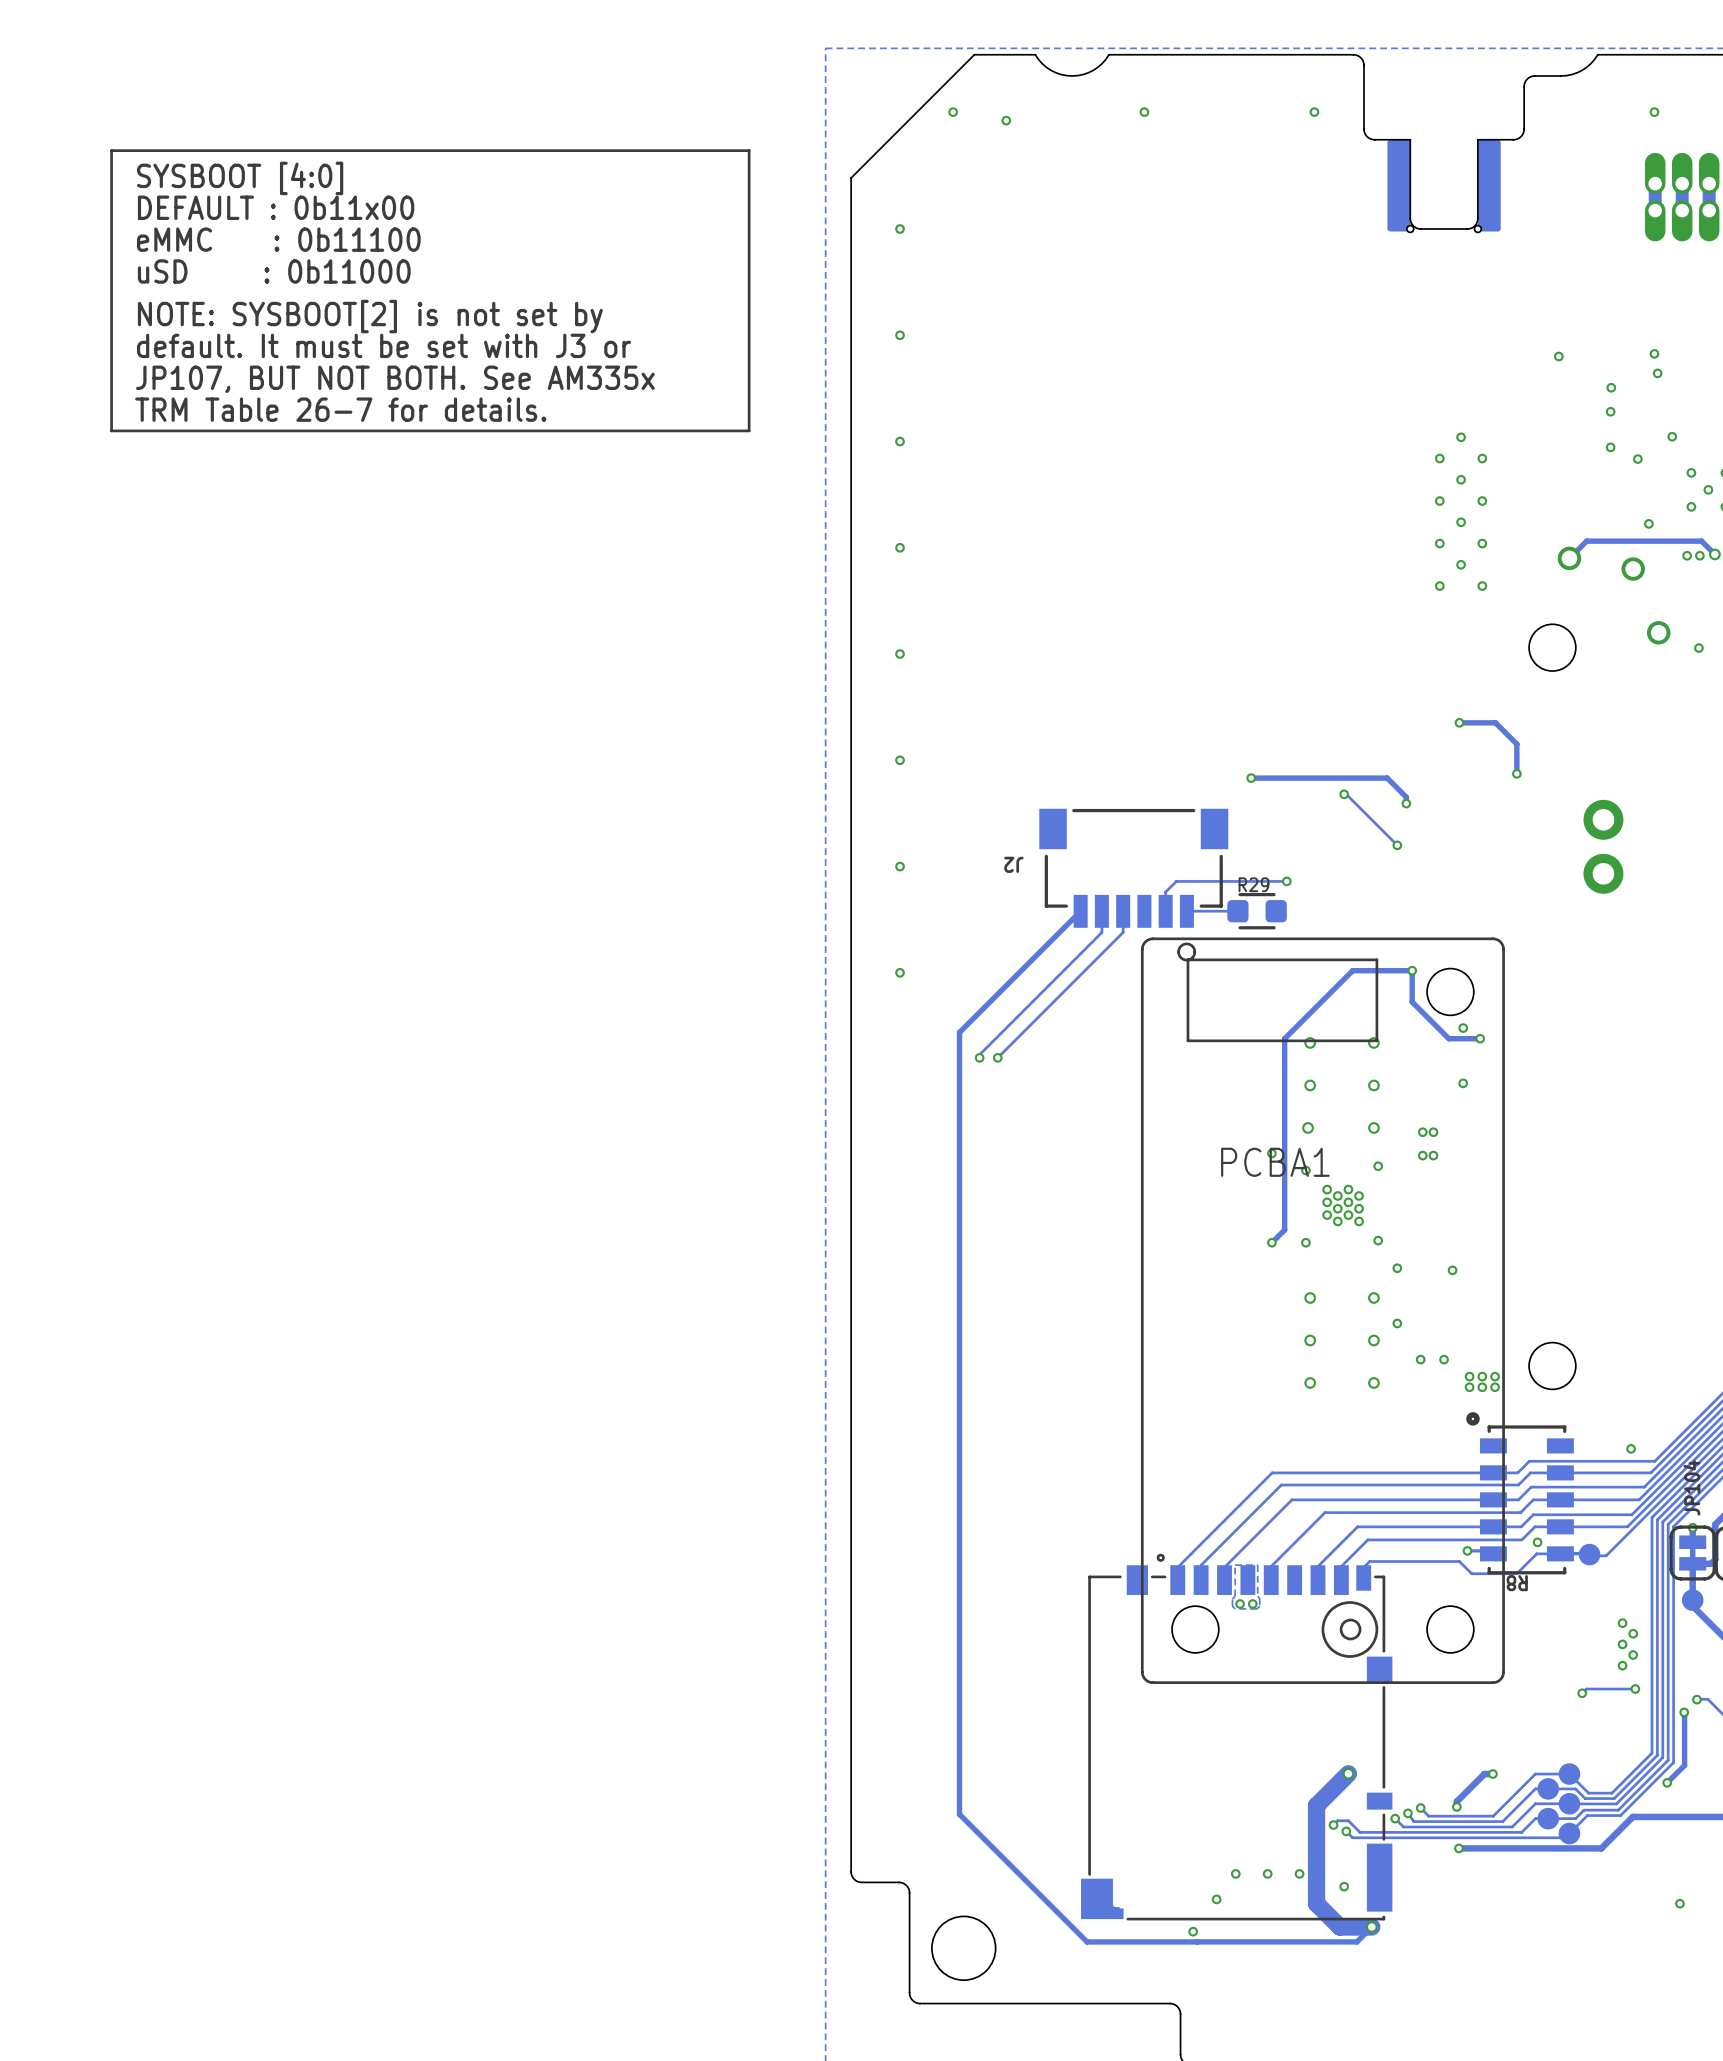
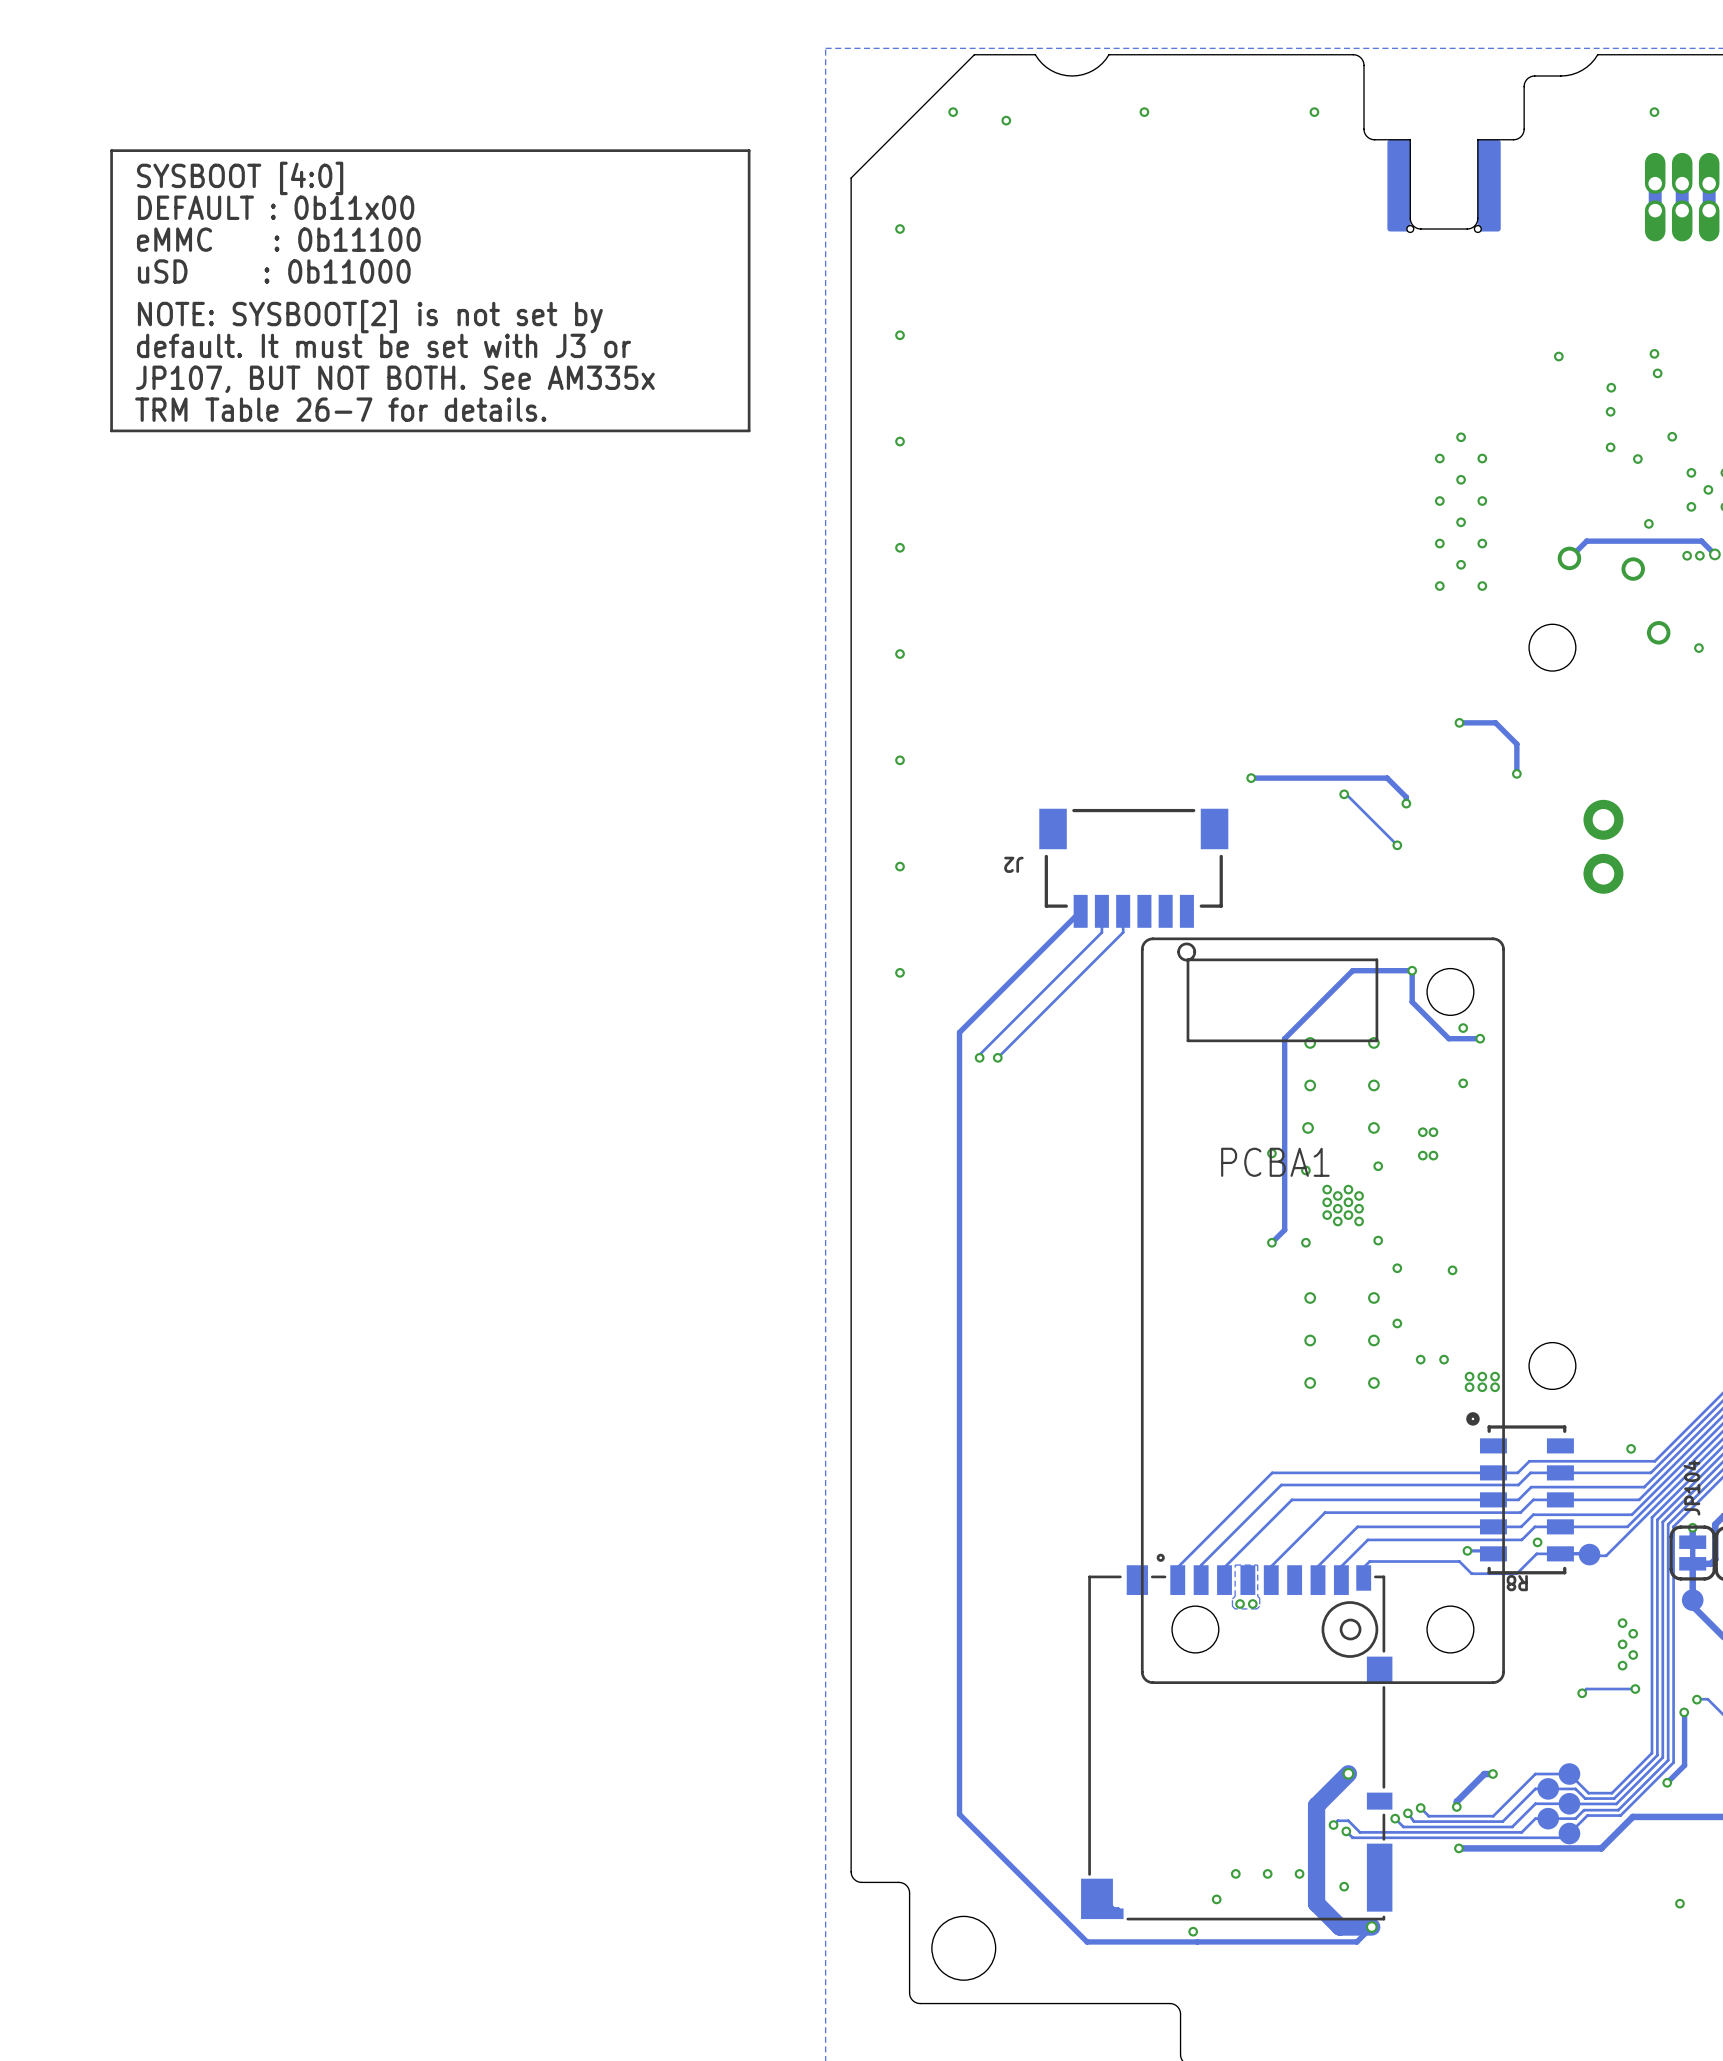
track: (1286, 881) (1176, 881) (1165, 892) (1165, 911) -> none
via: (1286, 881) -> none
track: (1237, 911) (1187, 911) -> none
R29: (1257, 911) -> none

